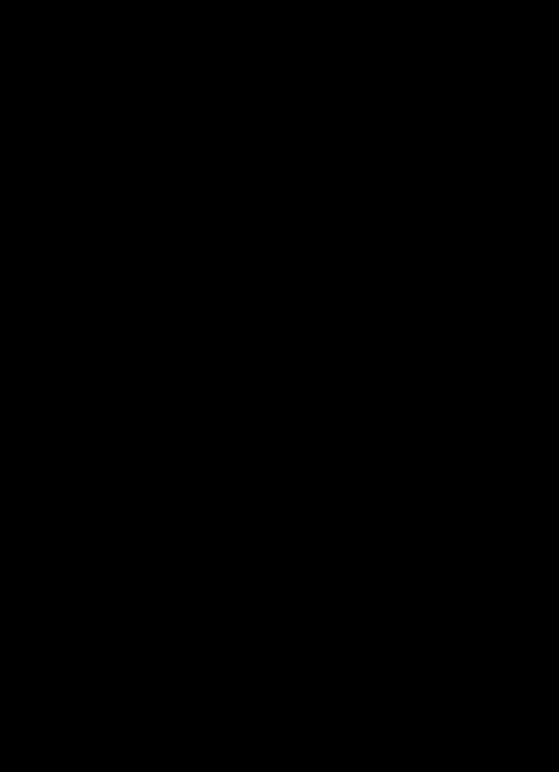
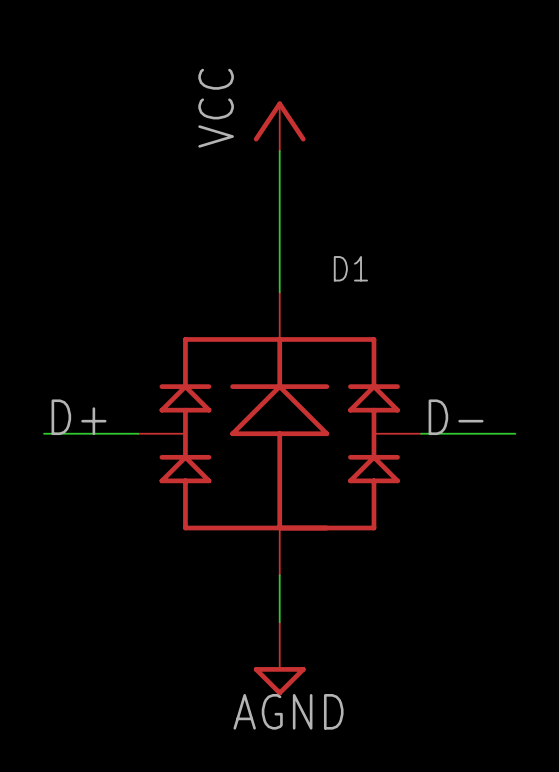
power symbol: none -> VCC (279, 126)
wire: none -> (279, 150) (279, 292)
label: none -> D+ (79, 417)
label: none -> D- (456, 417)
wire: none -> (44, 433) (138, 433)
D1: none -> (279, 433)
wire: none -> (421, 433) (515, 433)
wire: none -> (279, 575) (279, 622)
power symbol: none -> AGND (279, 658)

